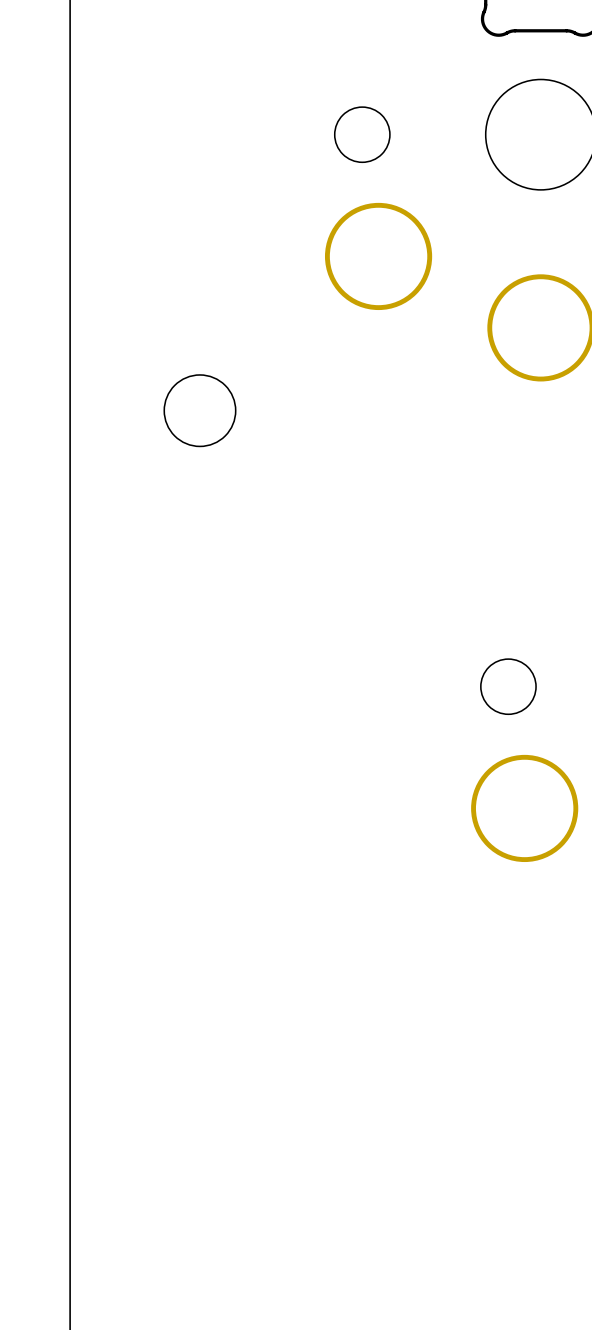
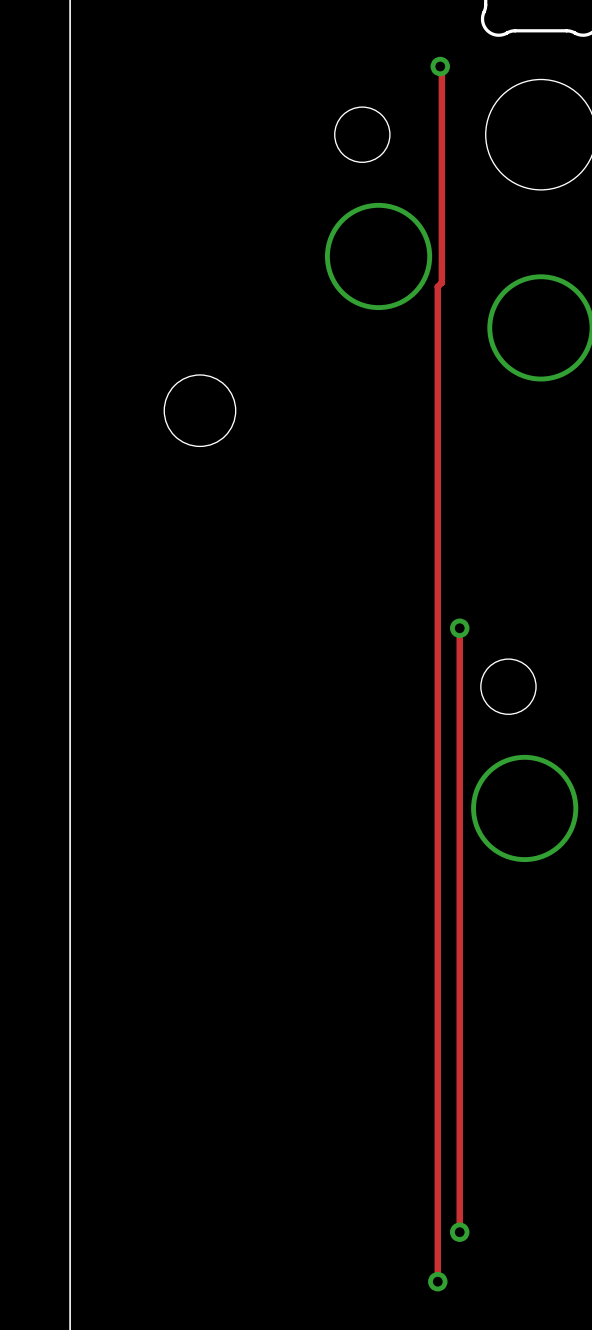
track: none -> (440, 66) (441, 68) (441, 282) (437, 286) (437, 1281)
via: none -> (440, 66)
track: none -> (459, 628) (459, 1232)
via: none -> (459, 628)
via: none -> (459, 1232)
via: none -> (437, 1281)

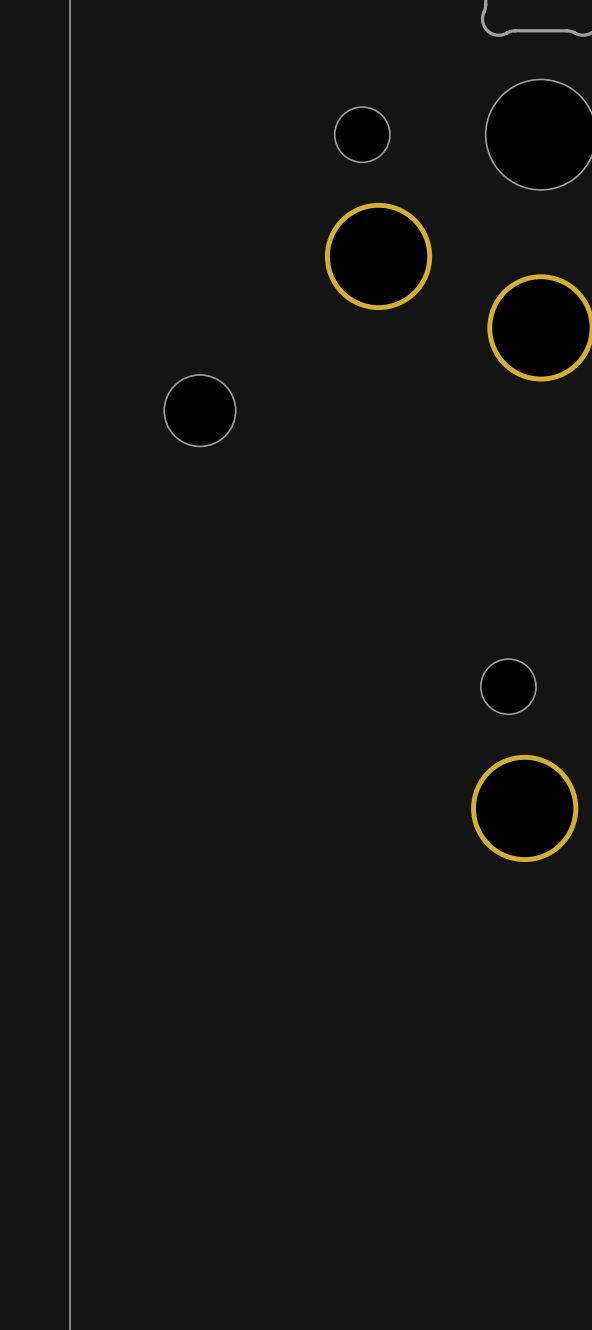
track: (440, 66) (441, 68) (441, 282) (437, 286) (437, 1281) -> none
via: (440, 66) -> none
track: (459, 628) (459, 1232) -> none
via: (459, 628) -> none
via: (459, 1232) -> none
via: (437, 1281) -> none

